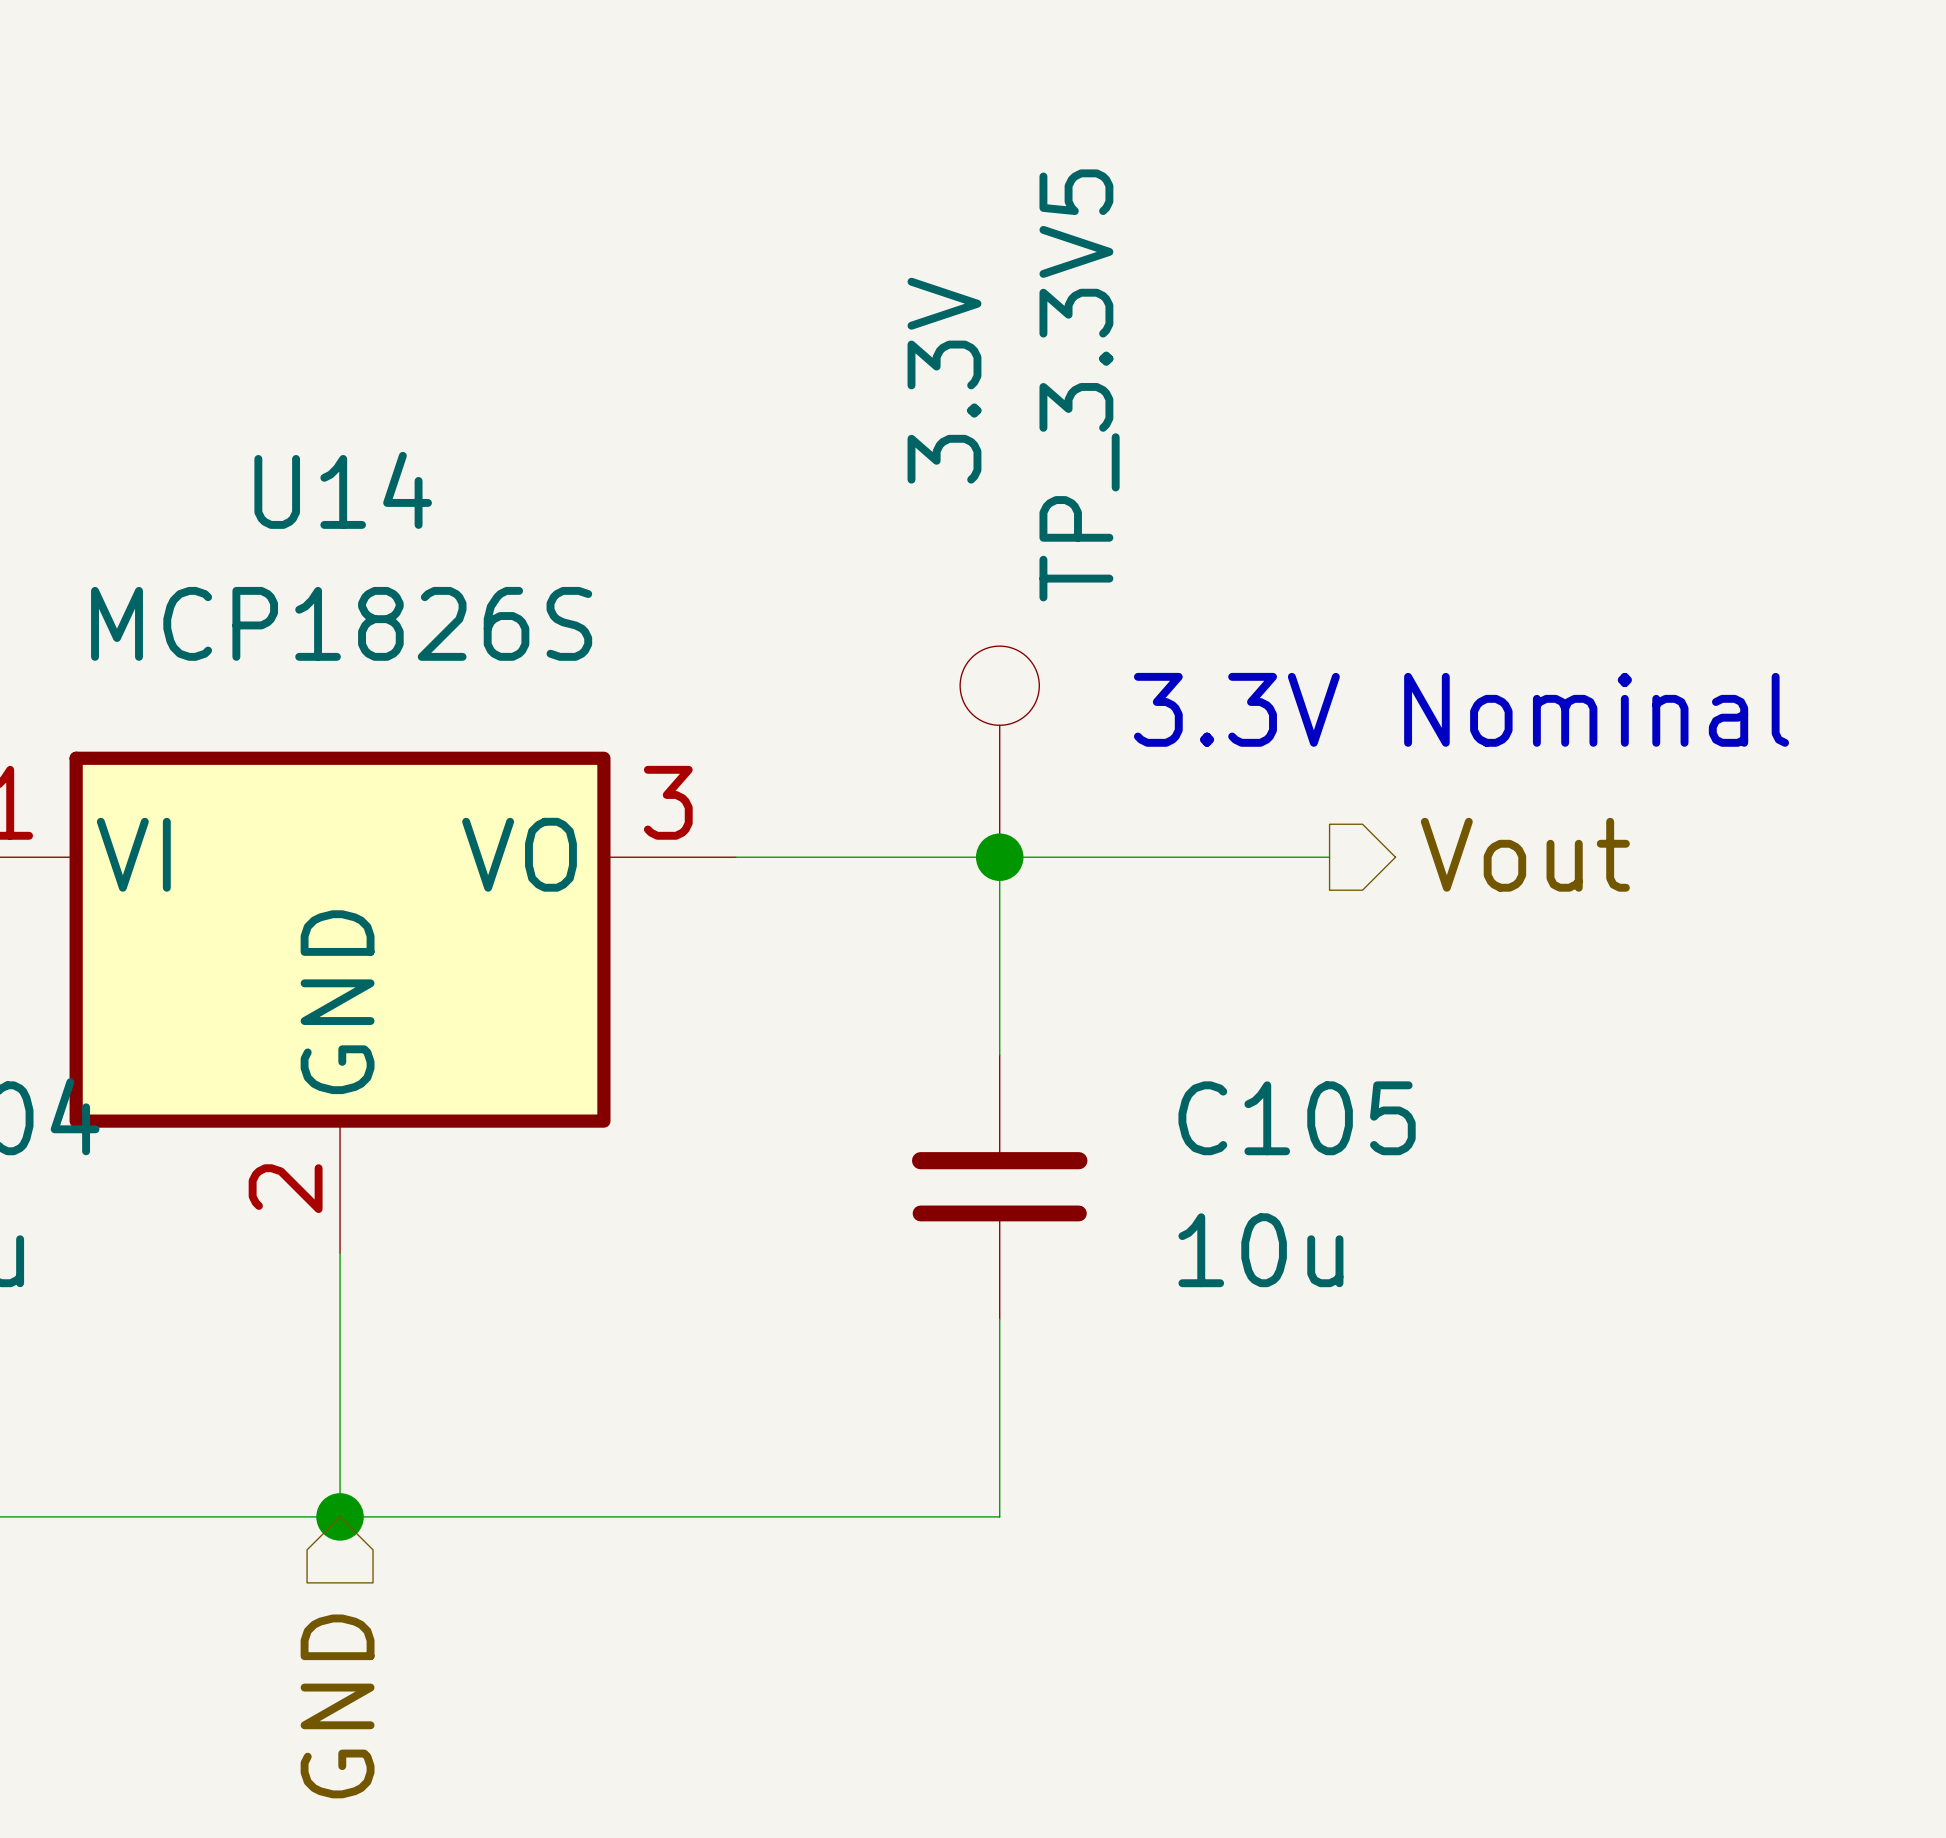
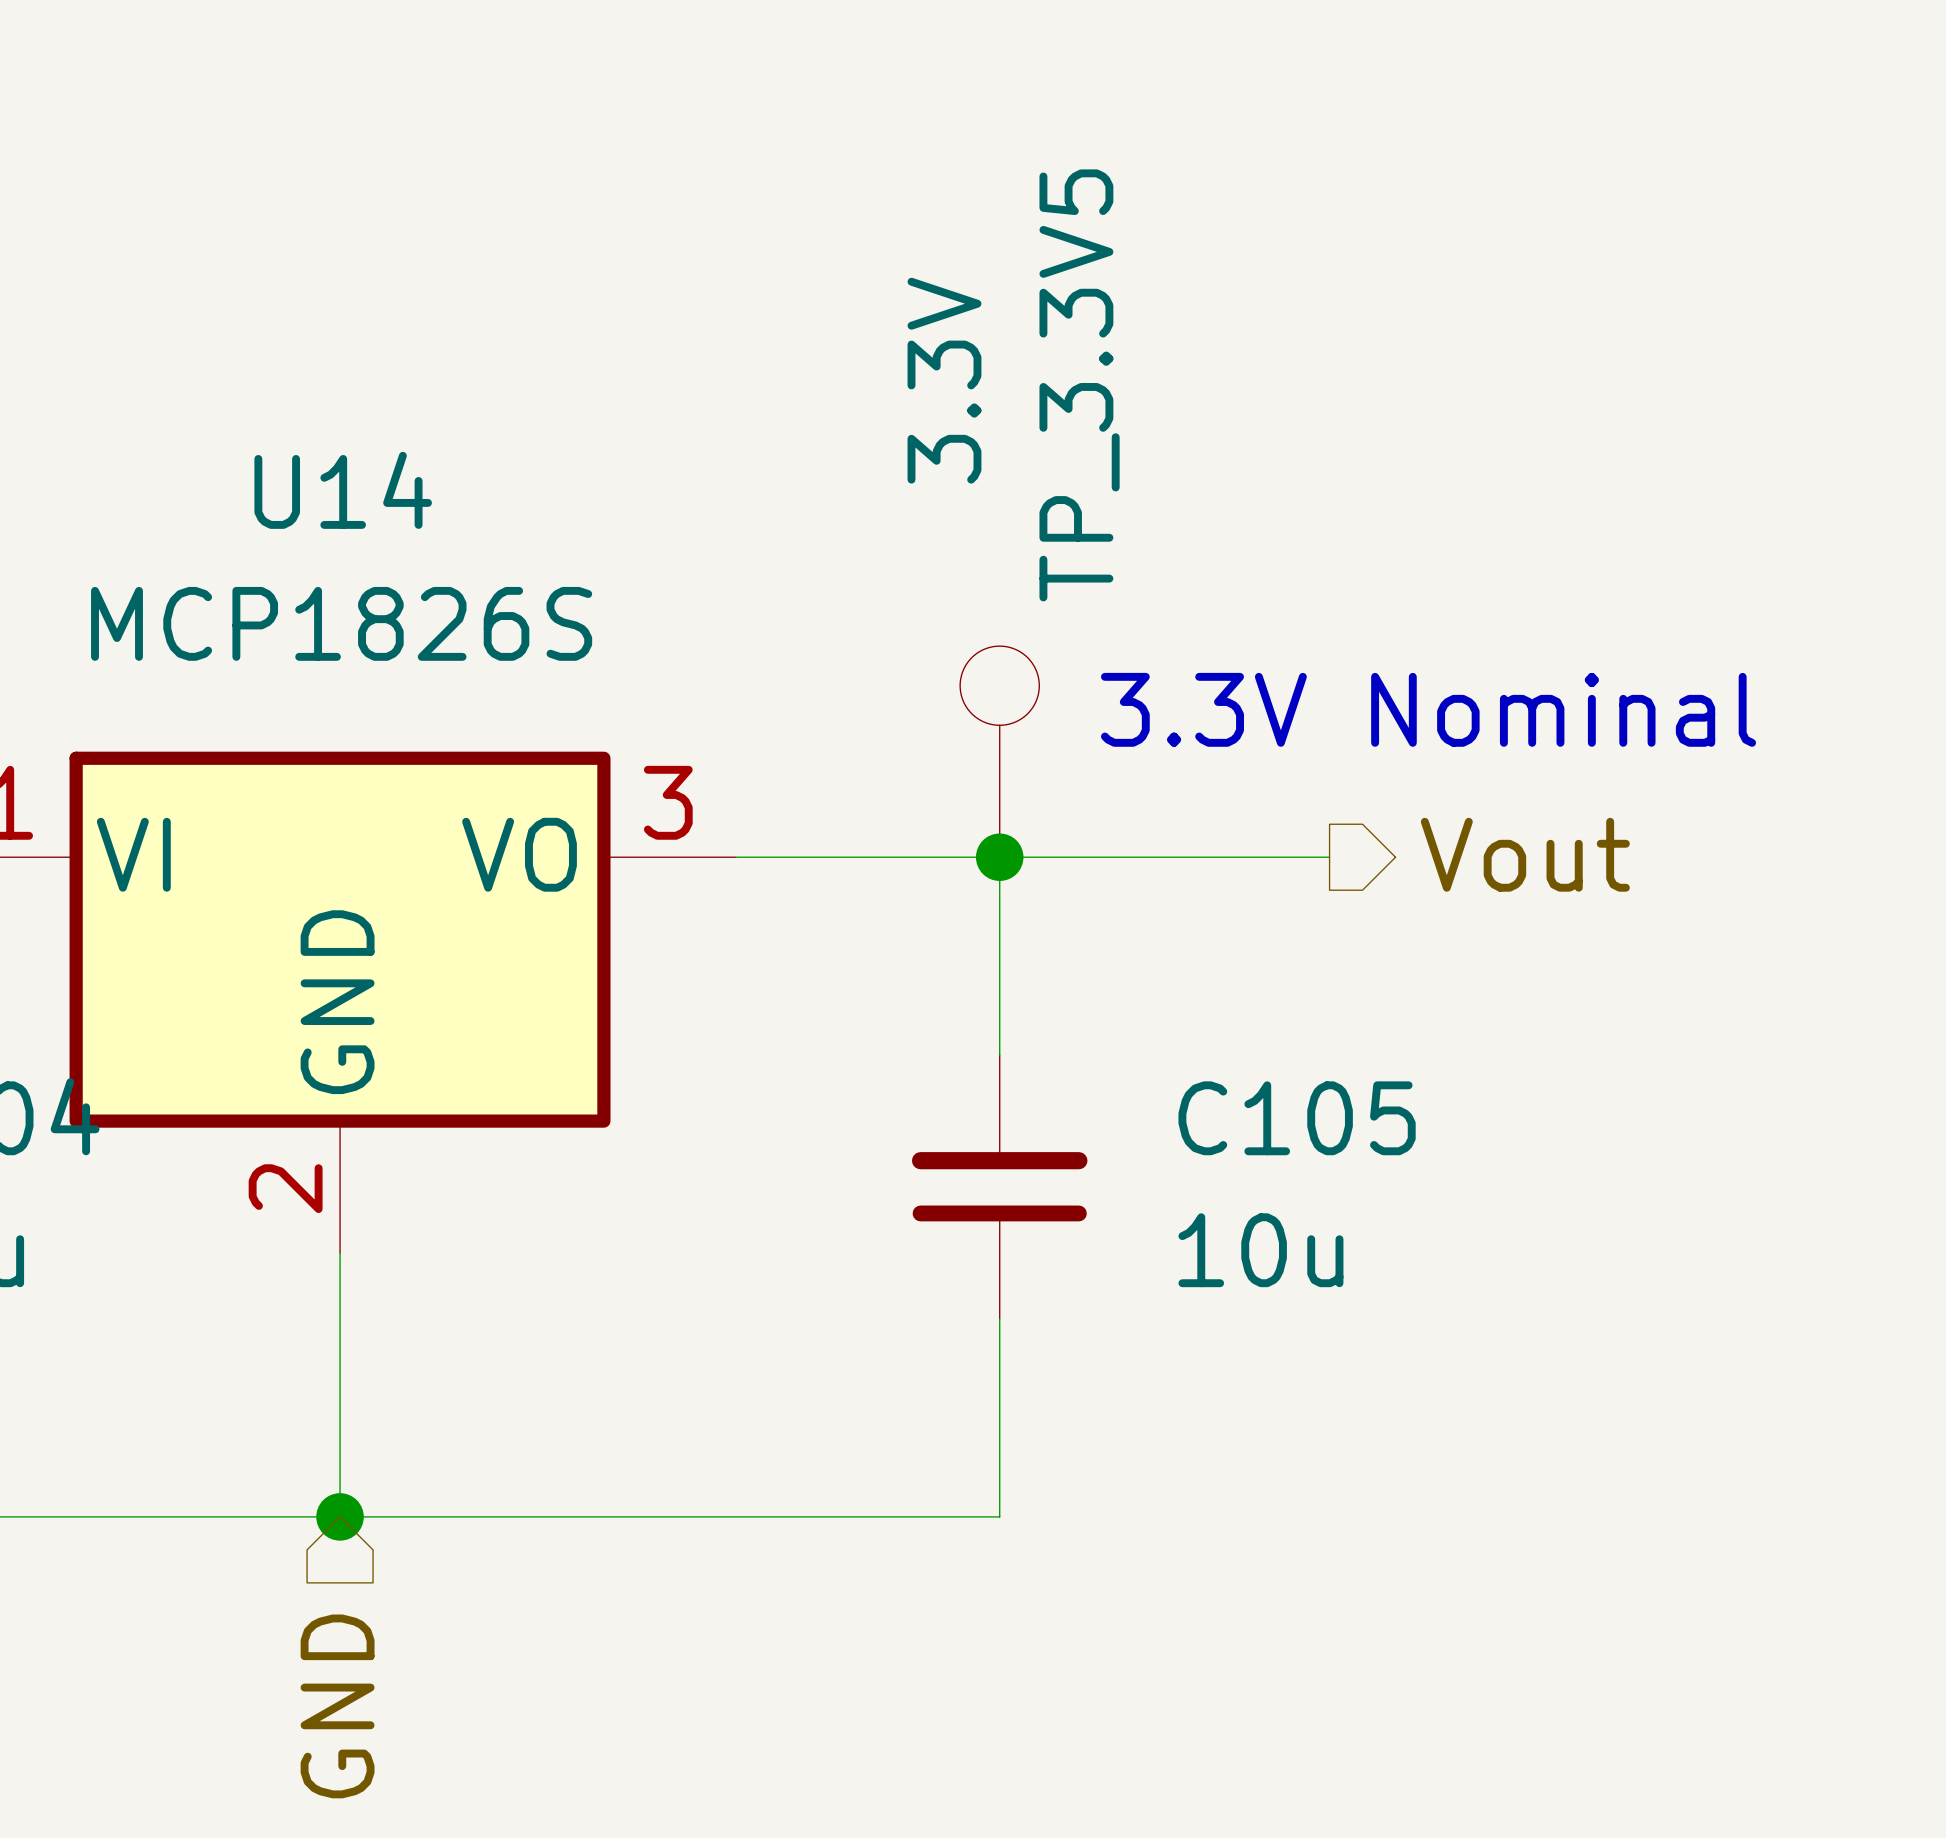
text position: 3.3V Nominal (1461, 709) -> 3.3V Nominal (1428, 709)

